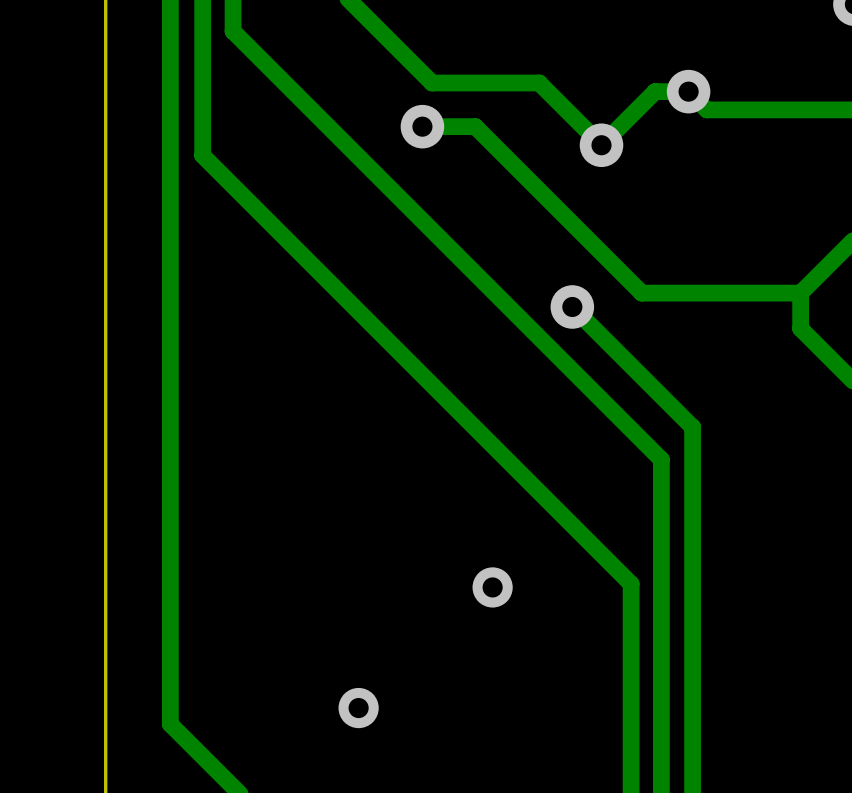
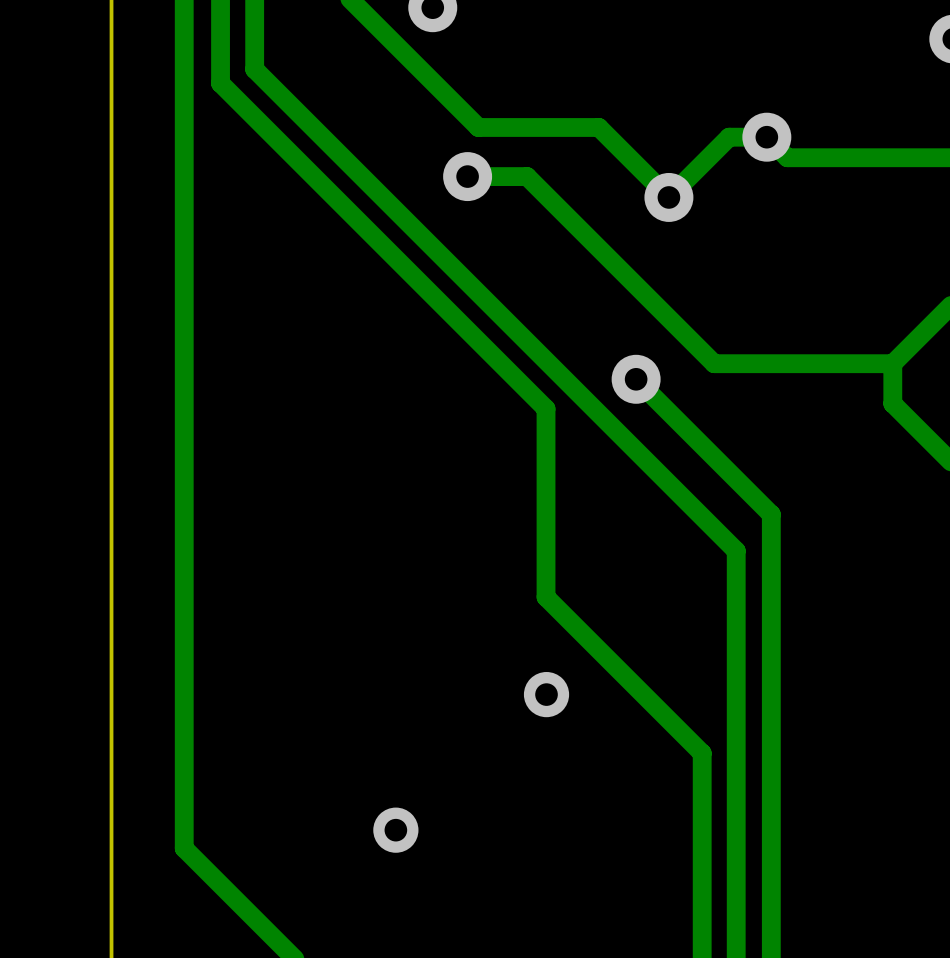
track: (202, 43) (202, 155) (631, 583) (631, 639) -> (220, 83) (546, 408) (546, 597) (702, 753)

